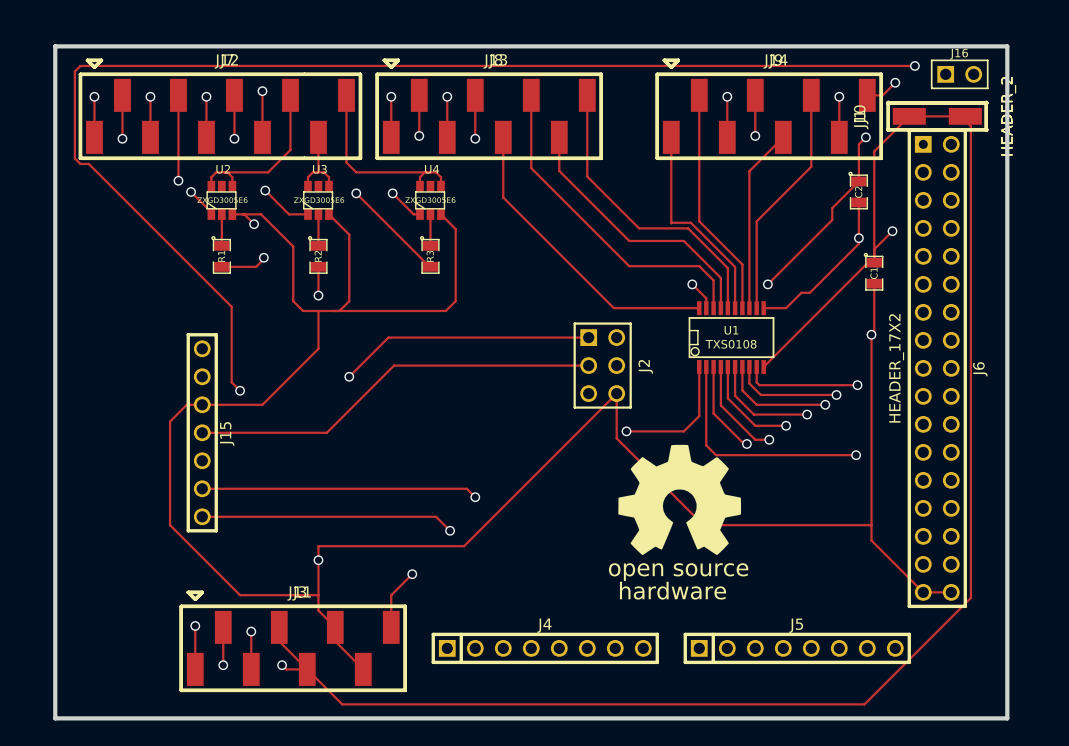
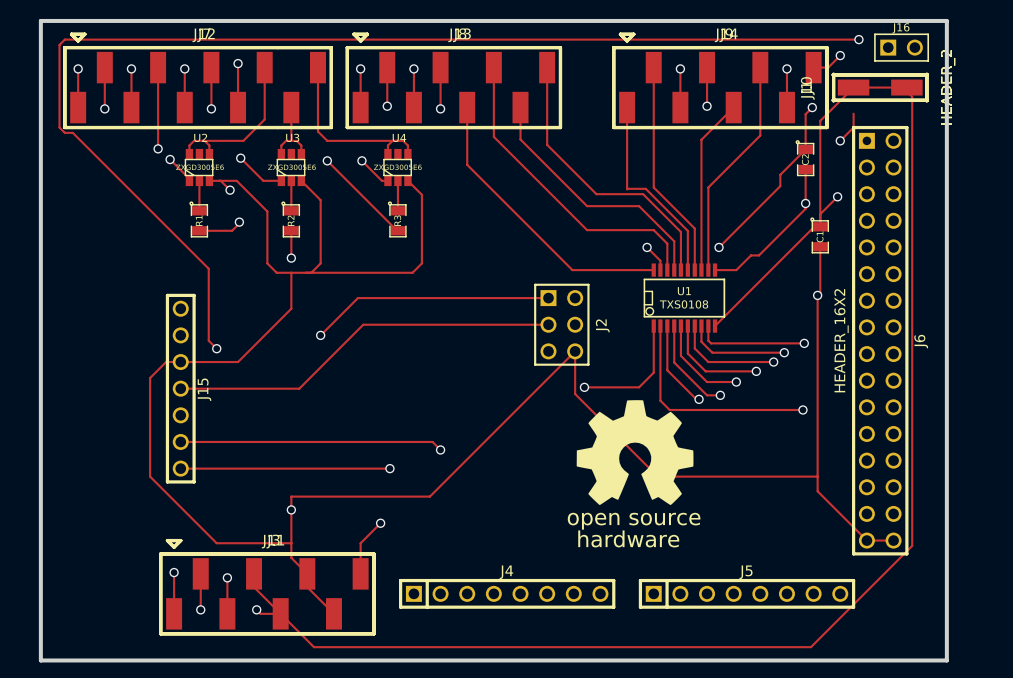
J6 footprint: [907, 128, 967, 609] -> [852, 125, 909, 556]
track: none -> (853, 113) (853, 127) (840, 140)
via: none -> (840, 140)
J6 value: HEADER_17X2 (896, 368) -> HEADER_16X2 (841, 340)
track: (422, 516) (436, 516) (450, 530) -> none
via position: (450, 530) -> (389, 468)

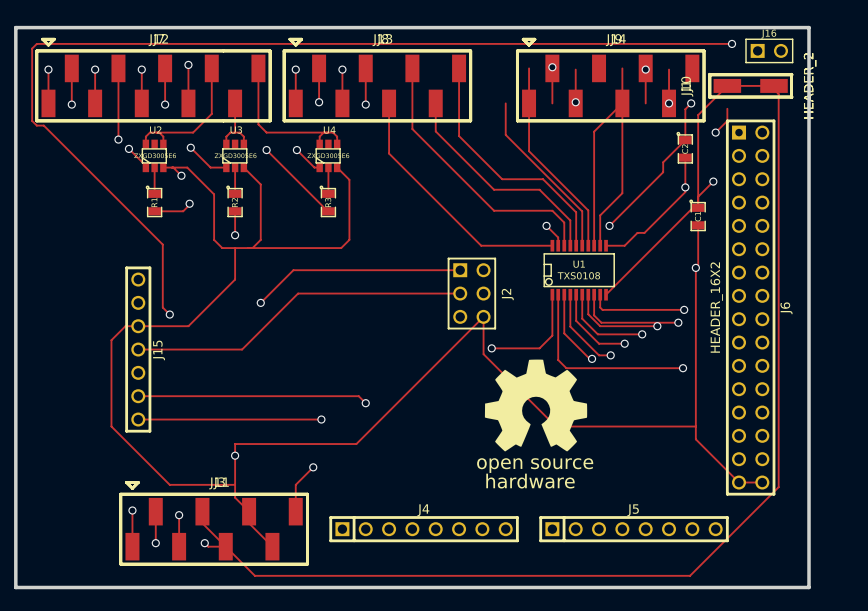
track: (840, 55) (828, 67) (813, 67) -> none
via: (840, 55) -> none
via: none -> (552, 67)
track: none -> (529, 68) (529, 103)
track: (707, 67) (707, 106) -> none
via: (680, 68) -> none
via: none -> (645, 69)
via: (786, 68) -> none
via: none -> (575, 102)
via: (707, 106) -> none
track: (653, 107) (653, 187) (694, 229) -> (529, 151) (588, 210)
track: (760, 107) (760, 135) (708, 187) (708, 235) -> (622, 68) (622, 193) (600, 215)
via: none -> (669, 103)
track: (627, 162) (627, 189) (645, 188) -> (505, 103) (505, 134) (545, 174)
track: (701, 341) (712, 352) (784, 352) -> (594, 308) (594, 315) (601, 322) (678, 322)
via position: (784, 352) -> (678, 322)

